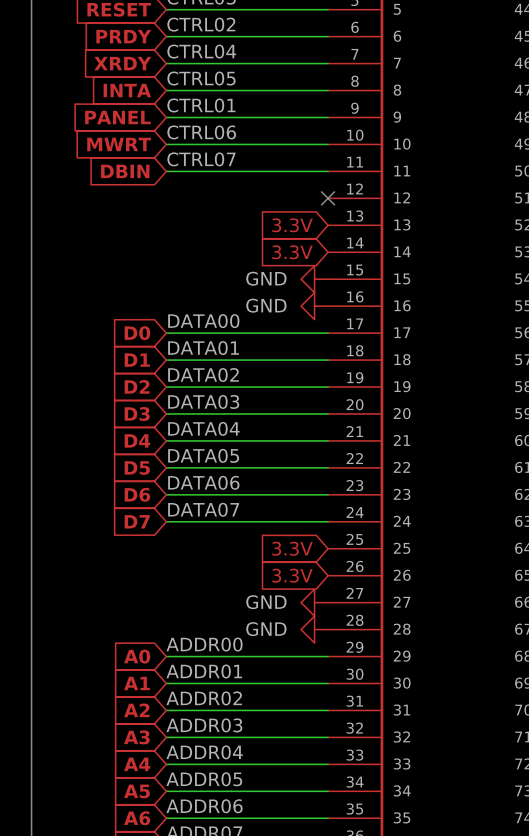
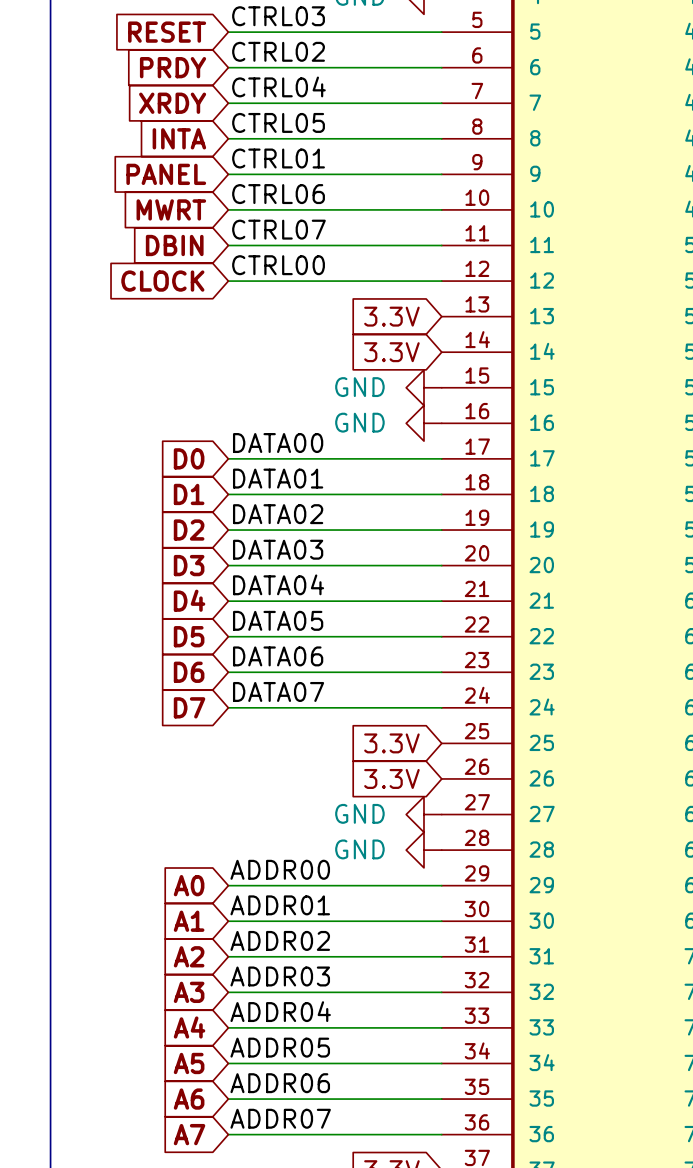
label: none -> CTRL00 (278, 265)
global label: none -> CLOCK (162, 281)
wire: none -> (228, 281) (441, 281)
no-connect mark: (328, 198) -> none

